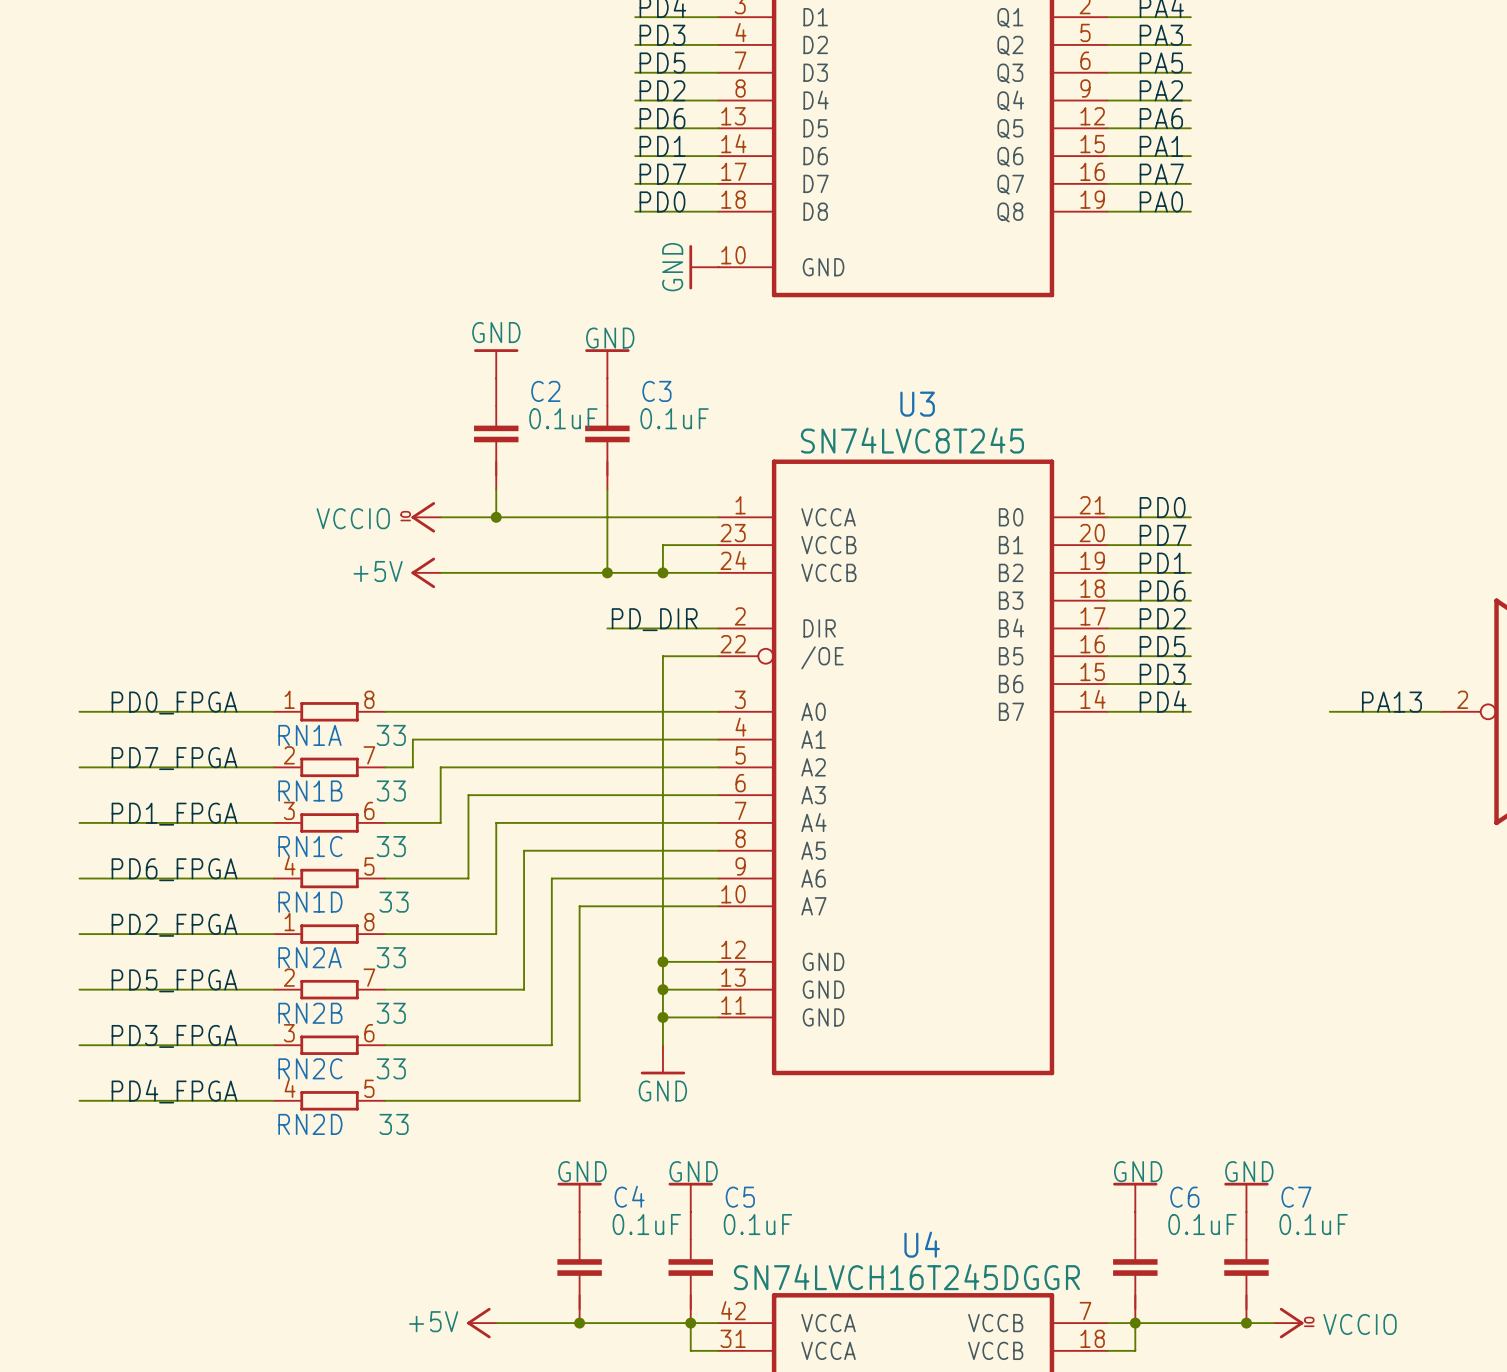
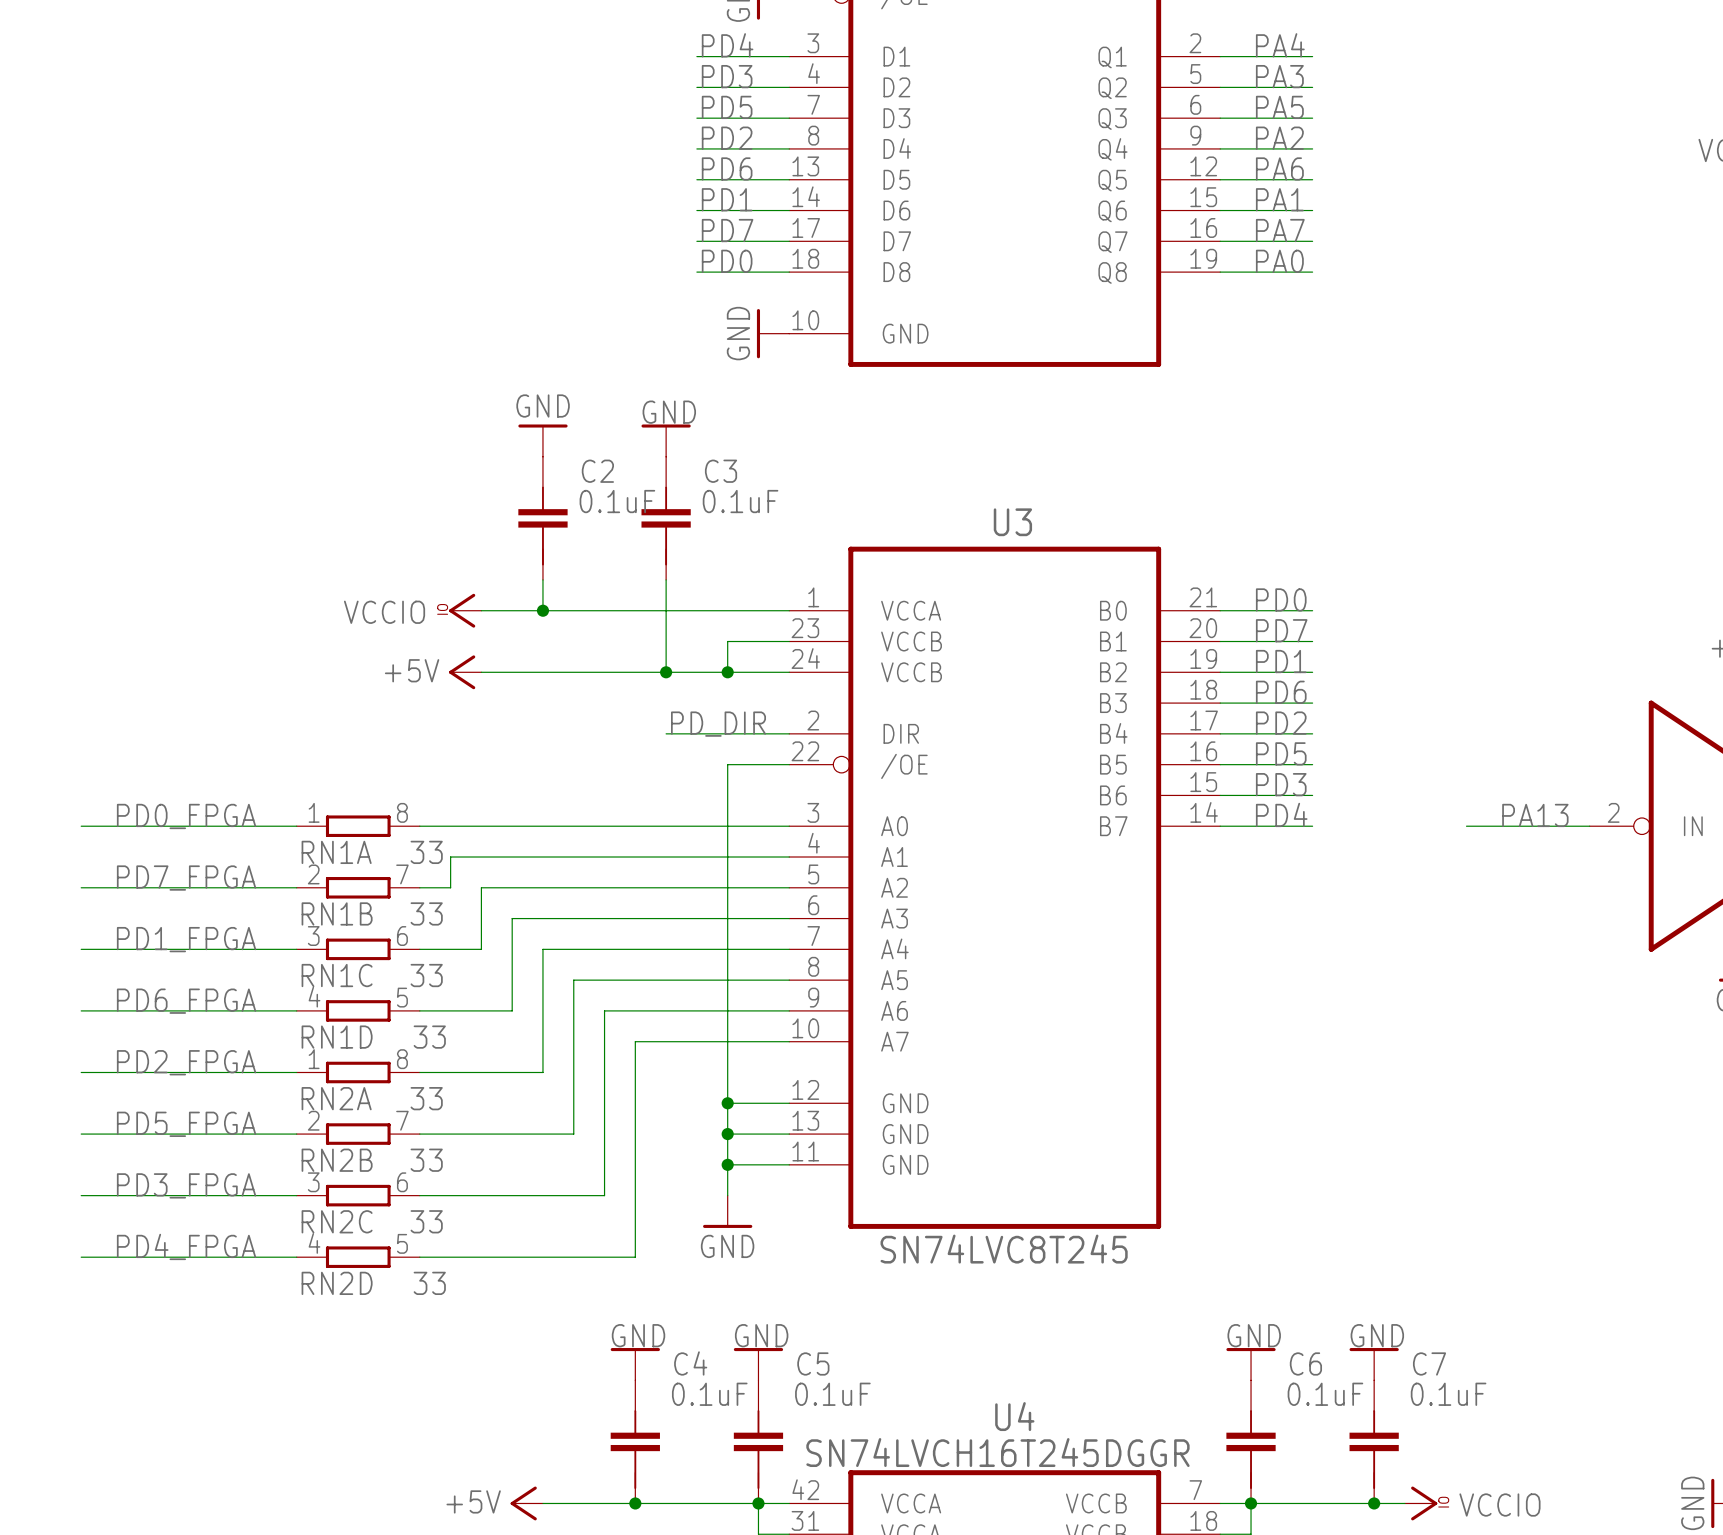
U3 name position: U3 (917, 404) -> U3 (1012, 522)
U3 value position: SN74LVC8T245 (912, 440) -> SN74LVC8T245 (1004, 1249)

